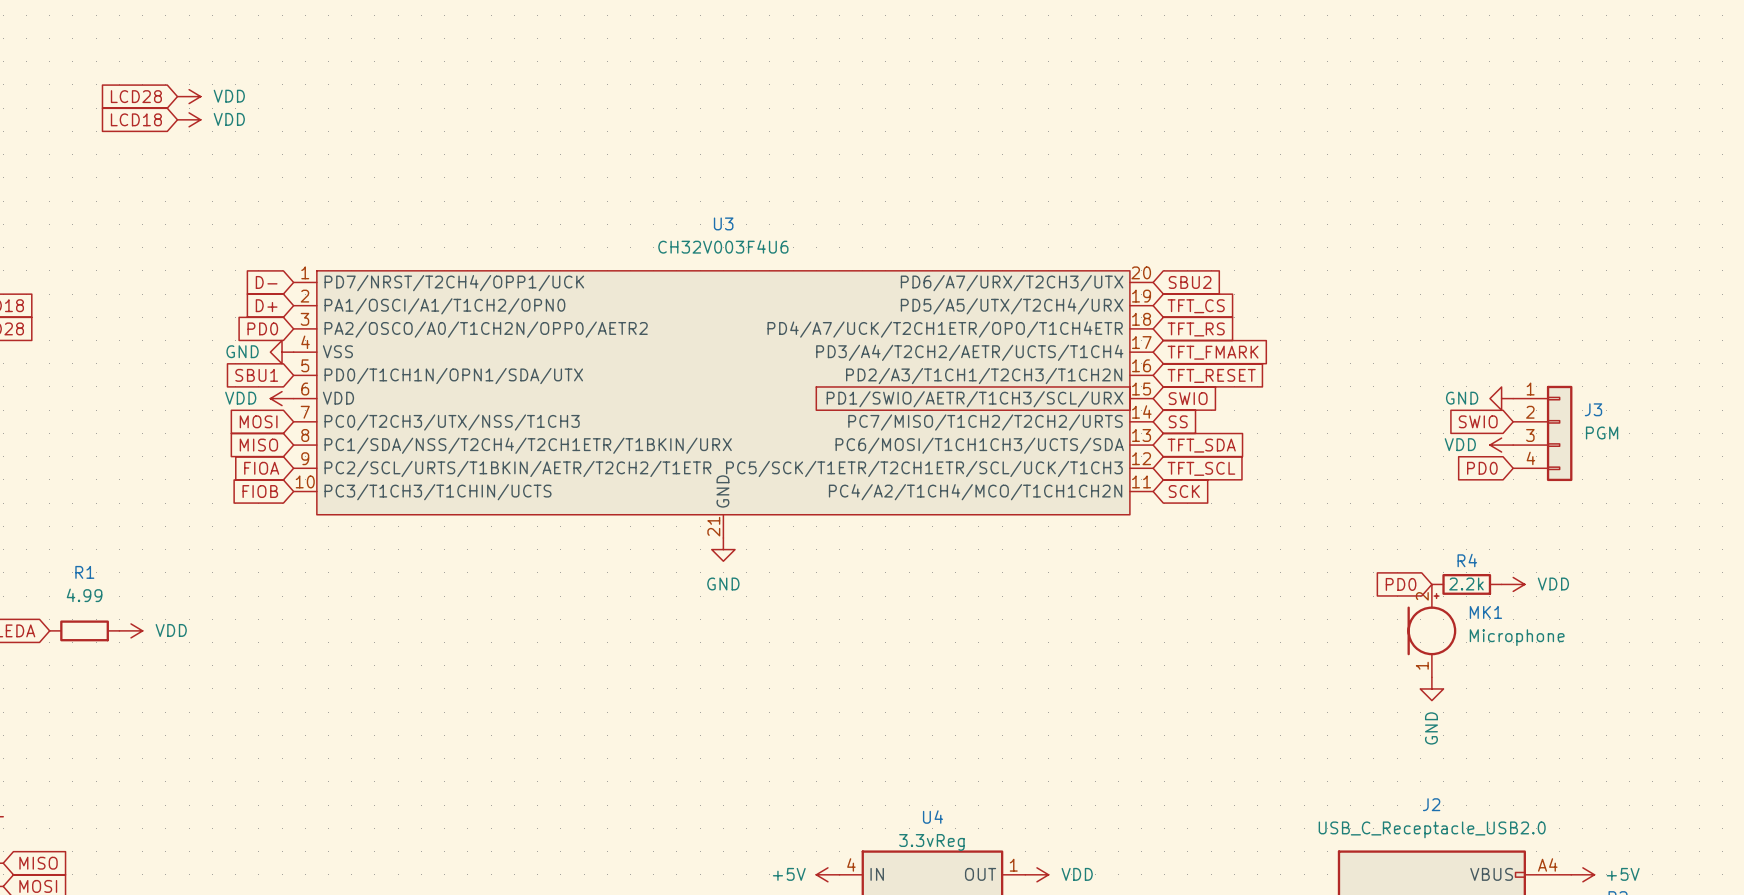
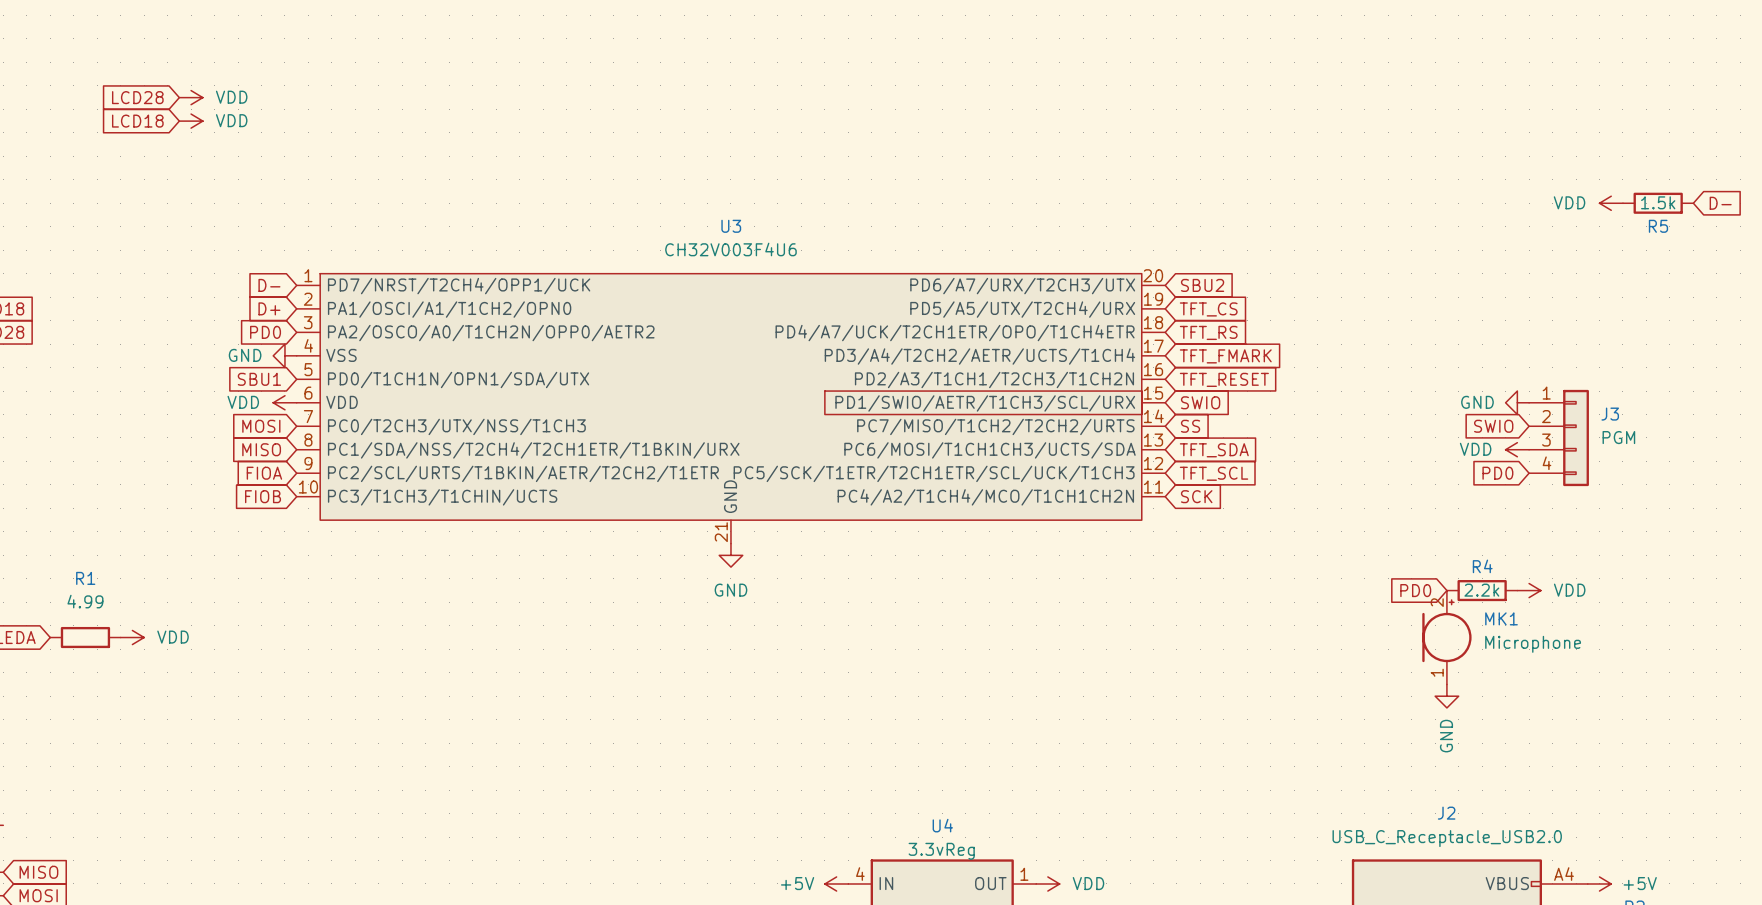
power symbol: none -> VDD (1611, 203)
R5: none -> 1.5k (1658, 203)
global label: none -> D- (1720, 203)

